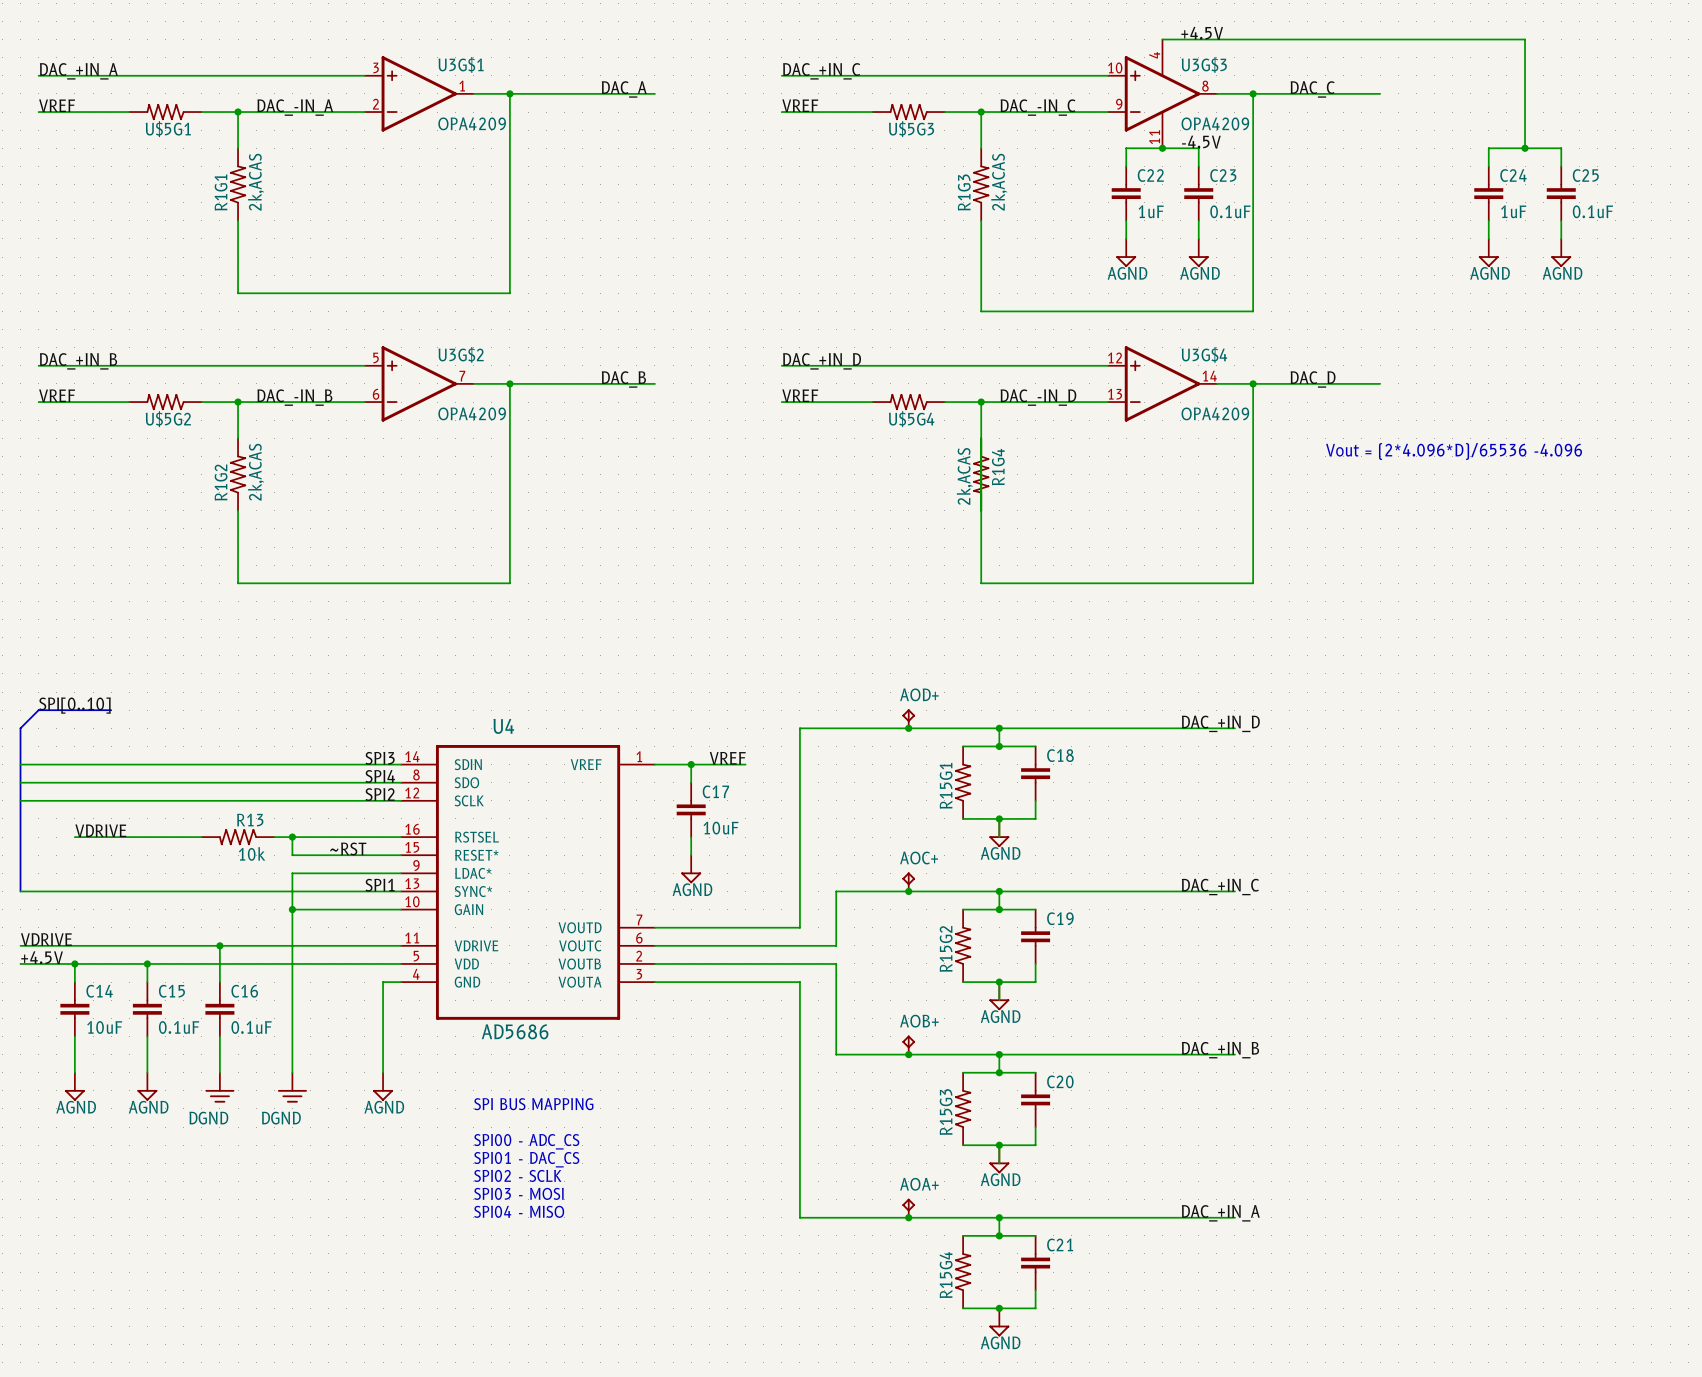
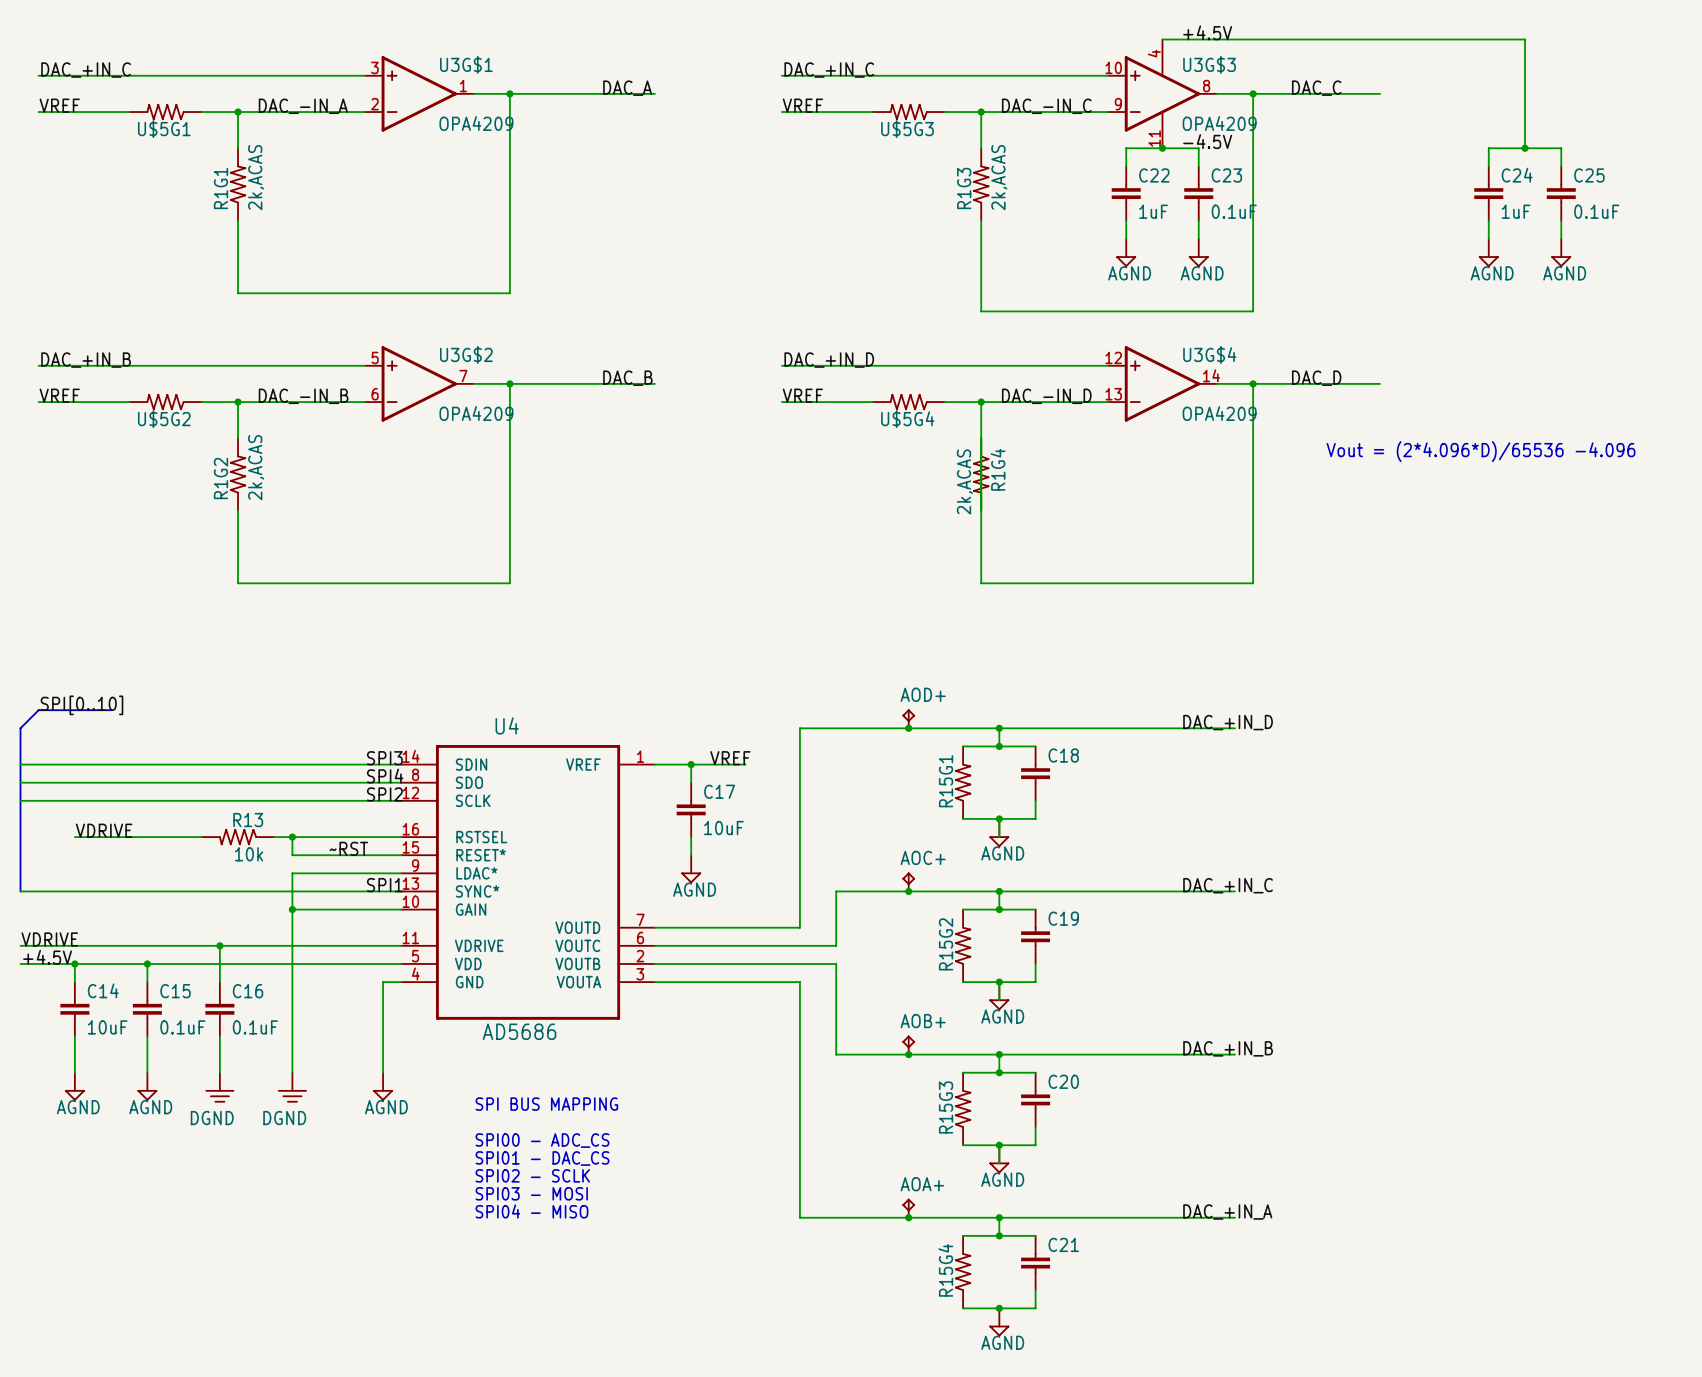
label: DAC_+IN_A (78, 71) -> DAC_+IN_C (86, 70)

